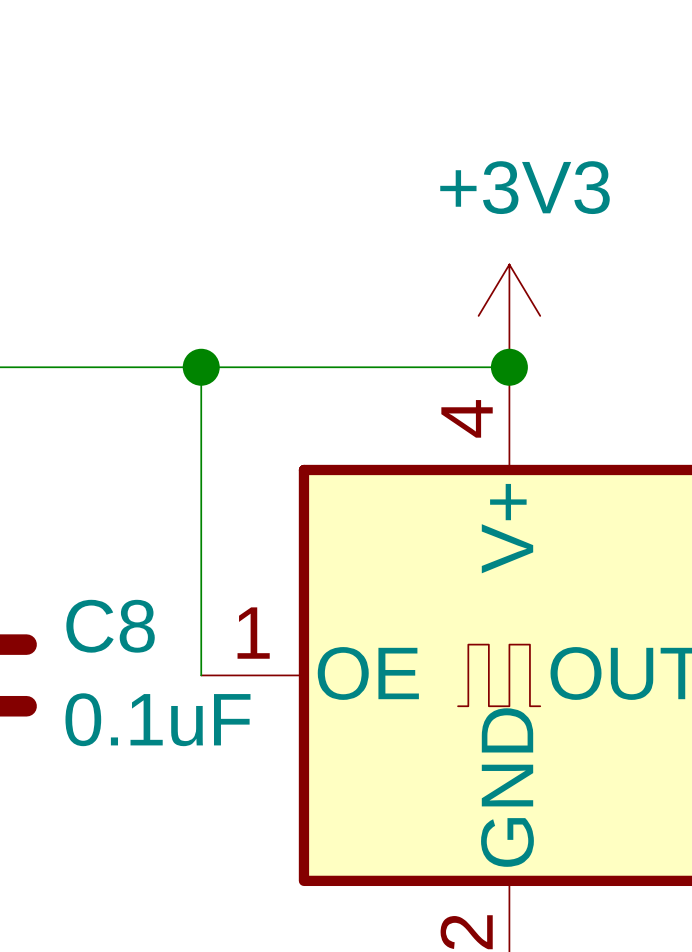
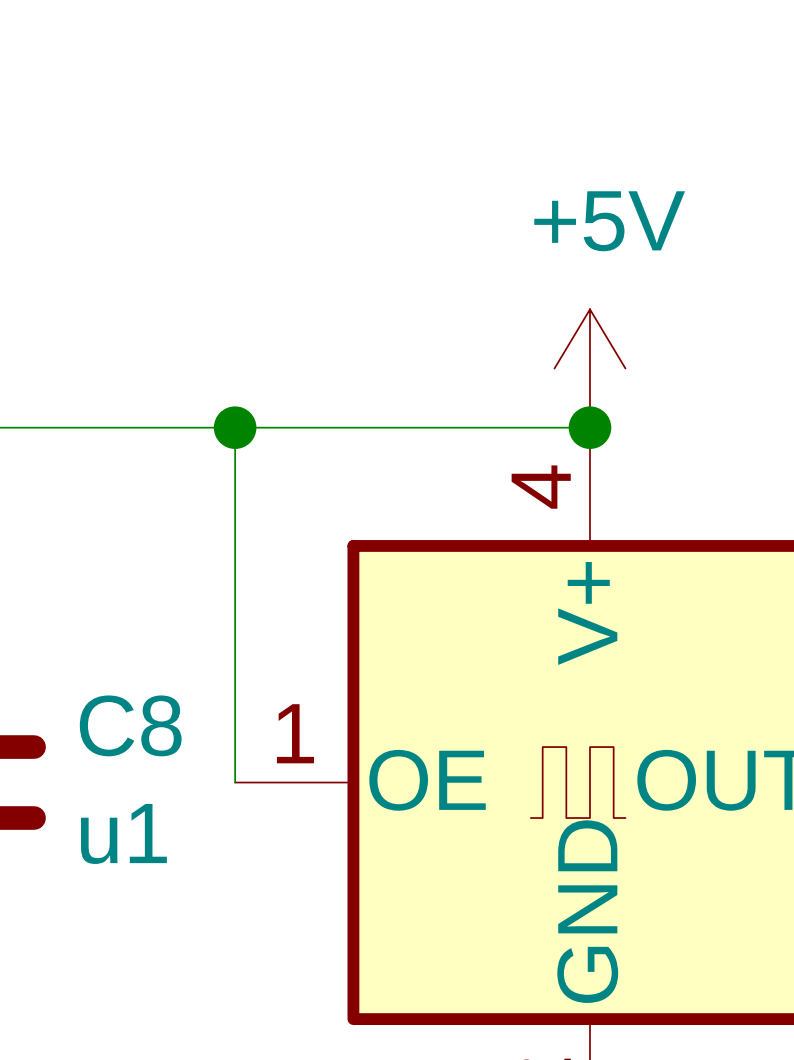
power symbol: +3V3 (509, 315) -> +5V (589, 368)
C8 value: 0.1uF (157, 719) -> u1 (123, 833)

